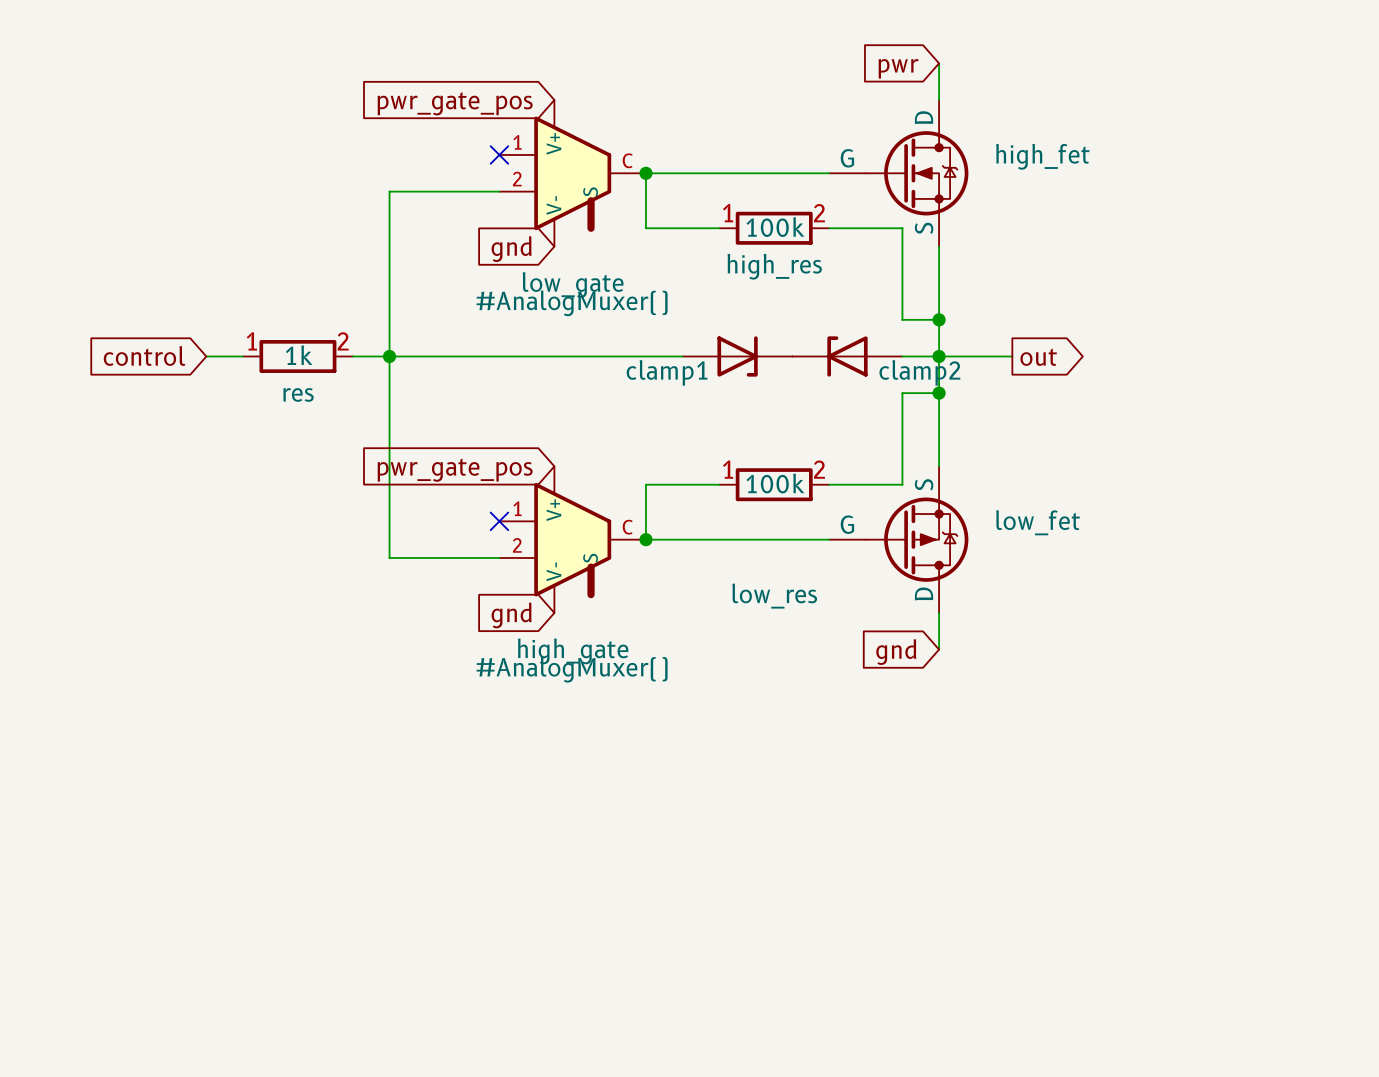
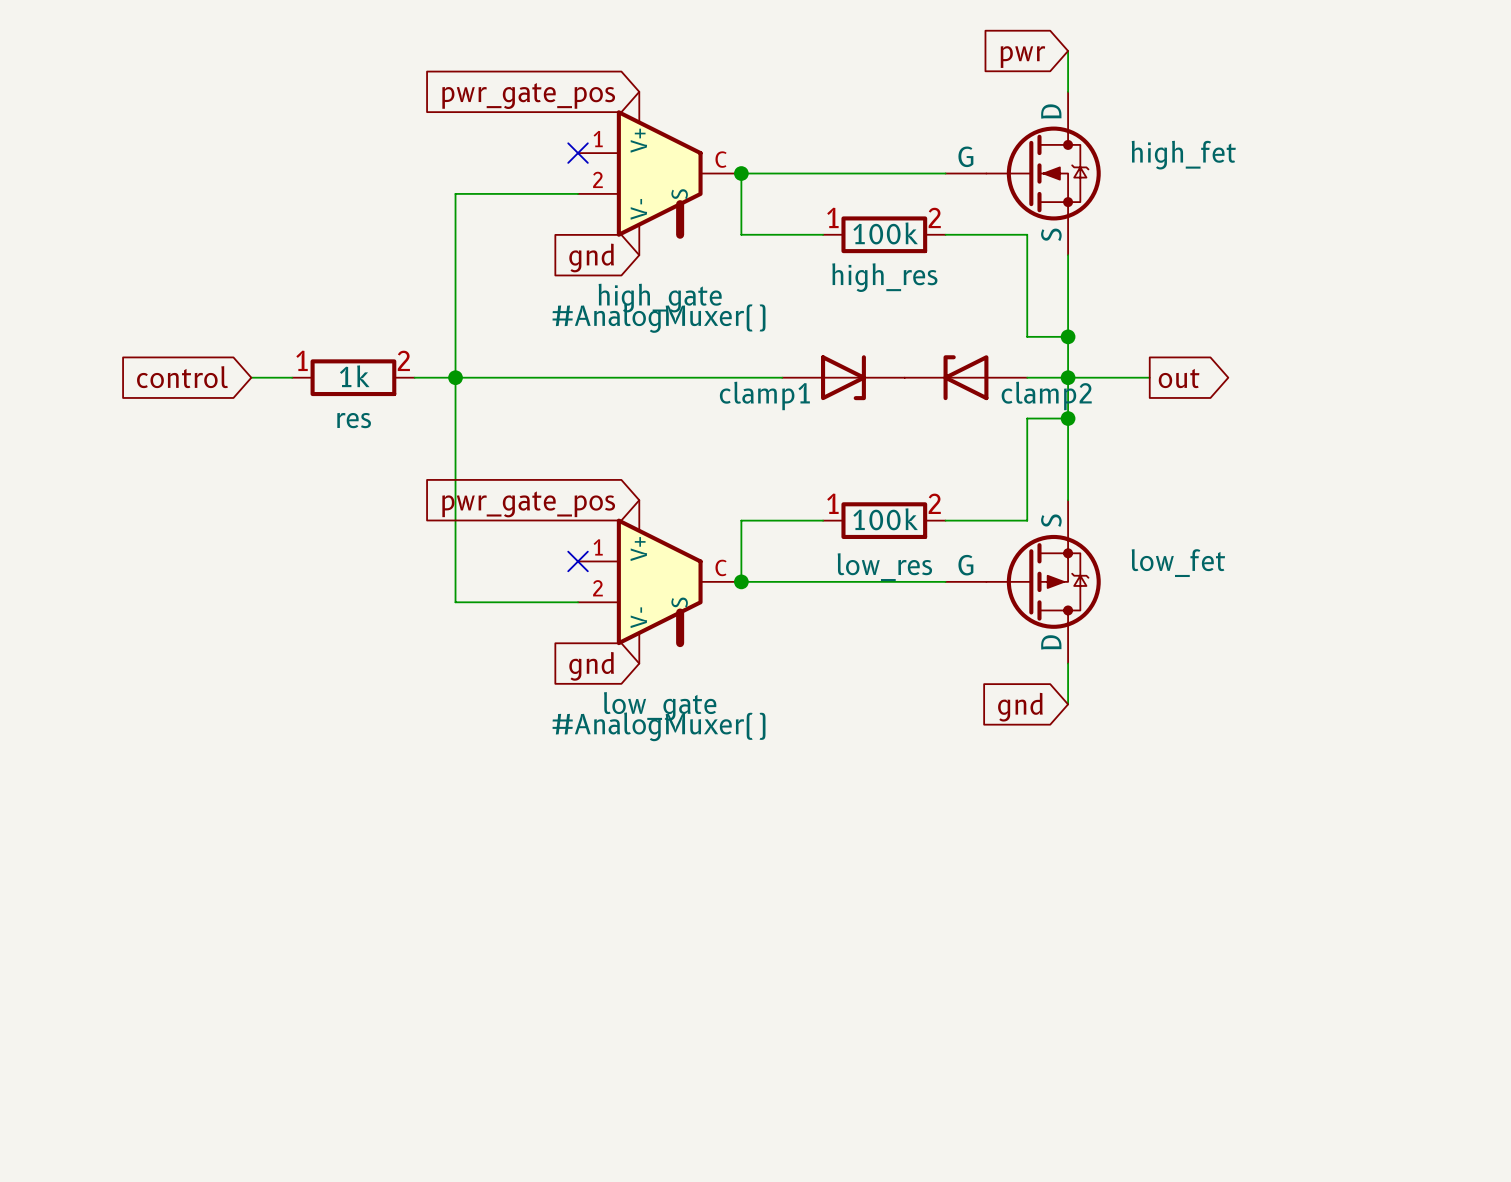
low_gate name: low_gate (573, 285) -> high_gate (660, 298)
low_res name position: low_res (774, 596) -> low_res (884, 567)
high_gate name: high_gate (573, 651) -> low_gate (660, 706)

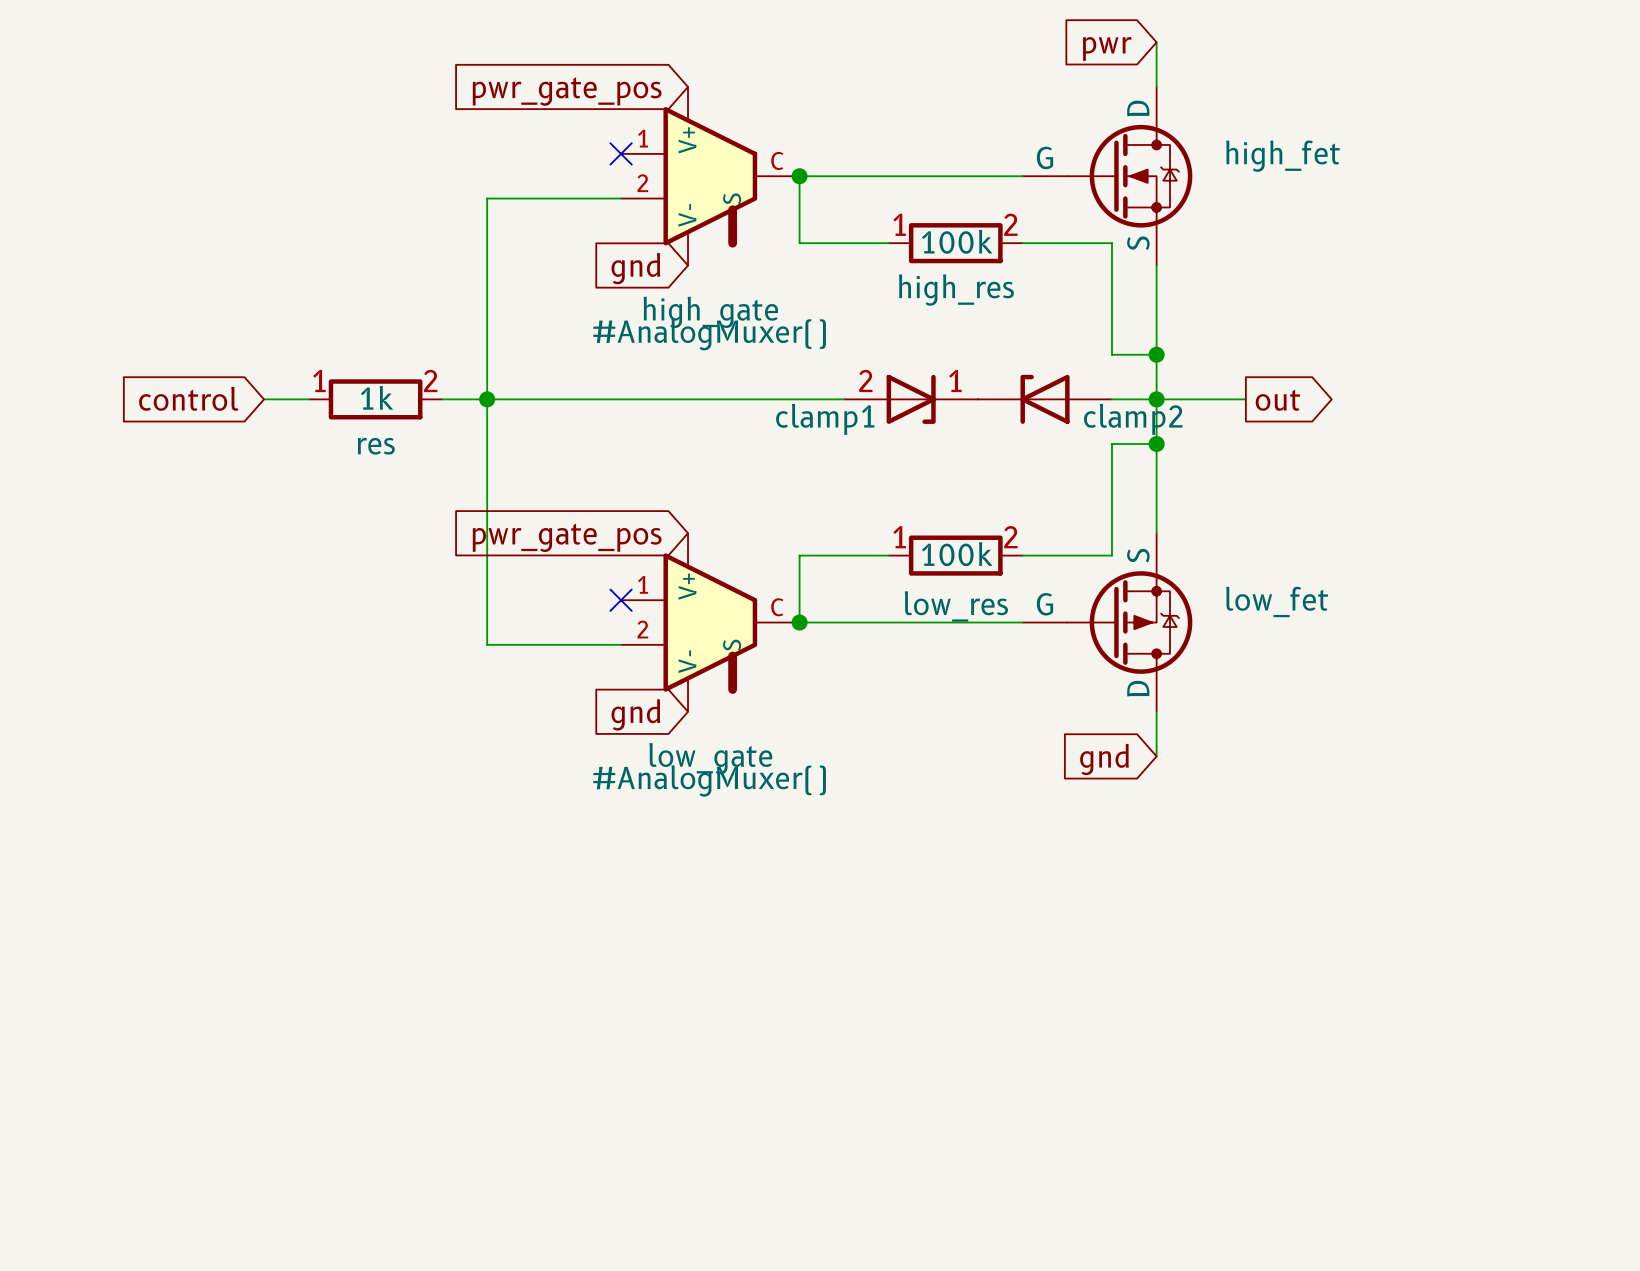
clamp1 pin number: none -> 2 (865, 380)
clamp1 pin number: none -> 1 (955, 380)

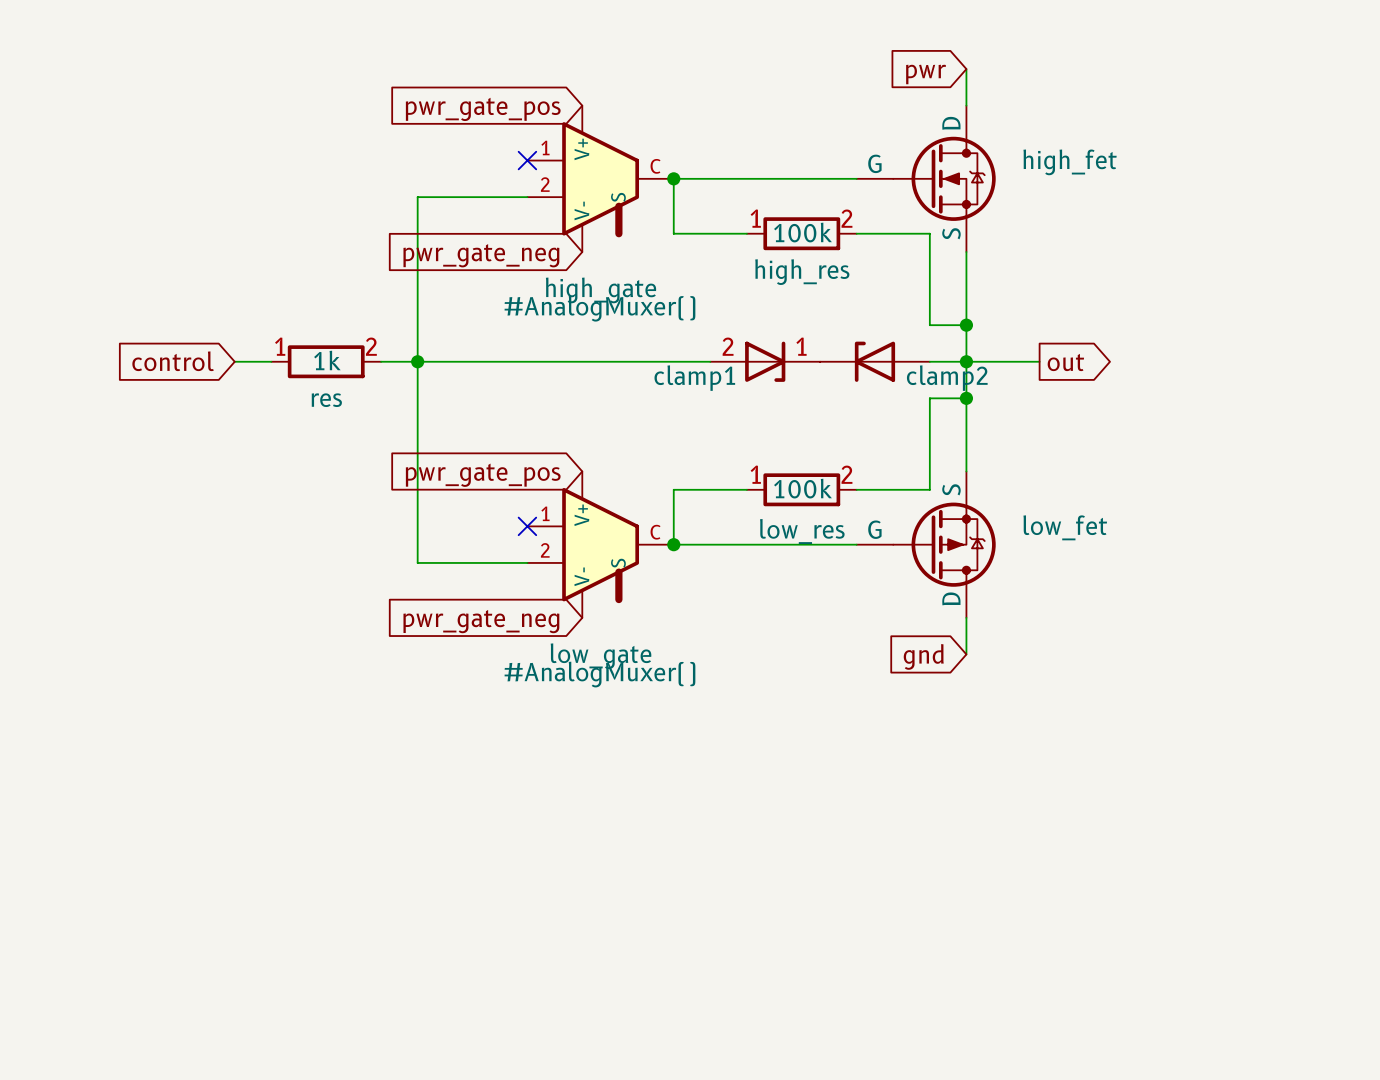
global label: gnd (635, 268) -> pwr_gate_neg (481, 255)
global label: gnd (635, 714) -> pwr_gate_neg (481, 621)

